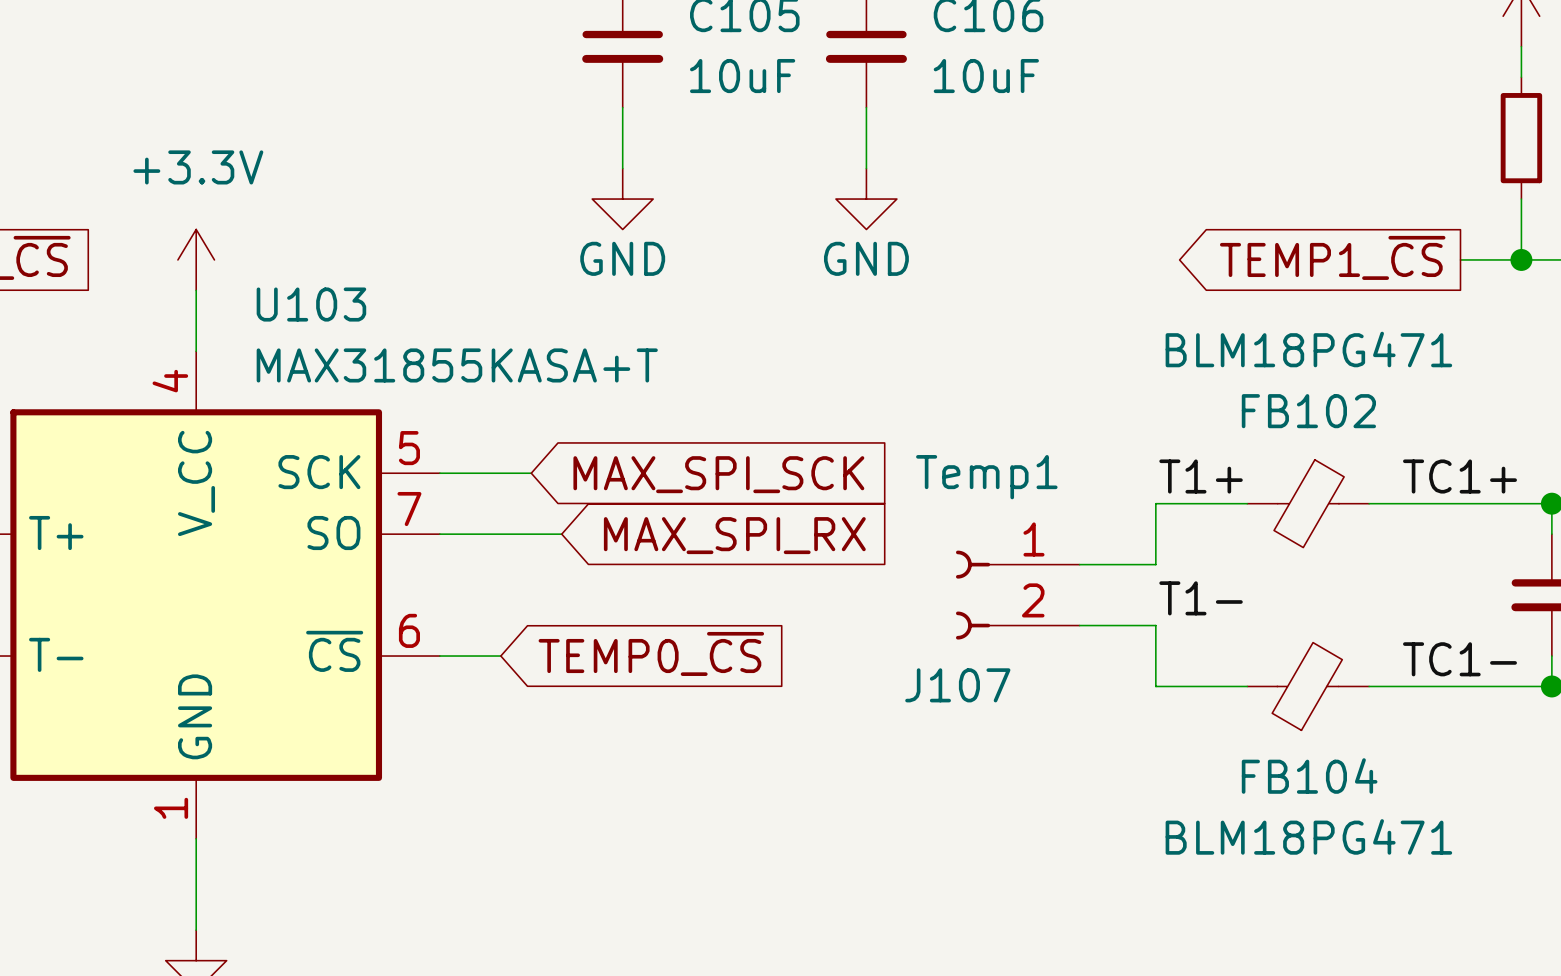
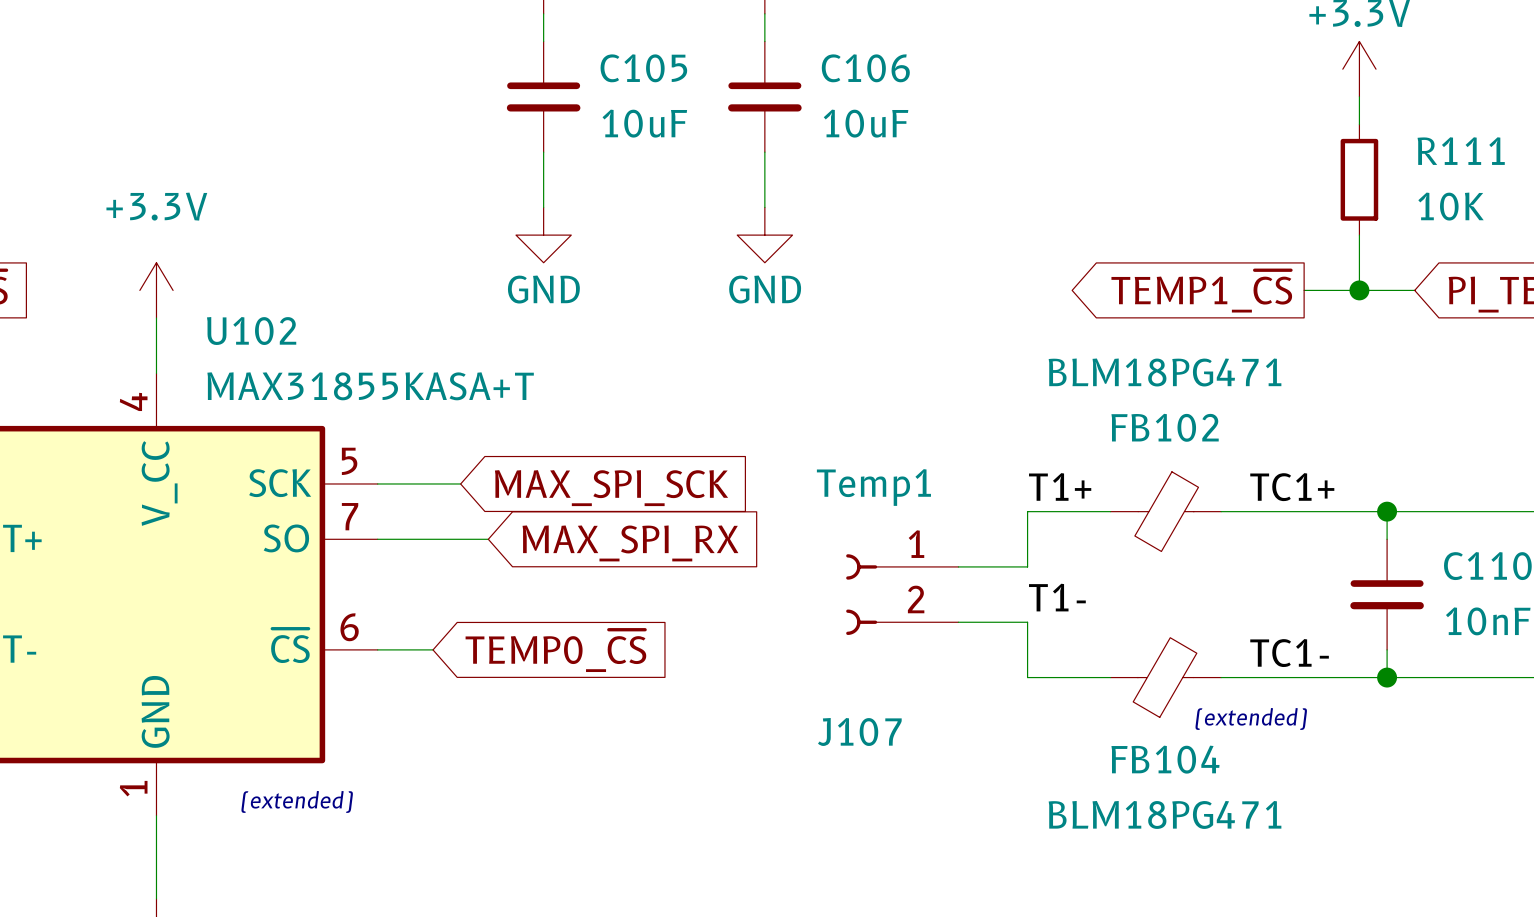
U103 name: U103 (311, 304) -> U102 (251, 331)
J107 name position: J107 (957, 685) -> J107 (859, 731)
text: none -> (extended) (1251, 718)
text: none -> (extended) (297, 801)

